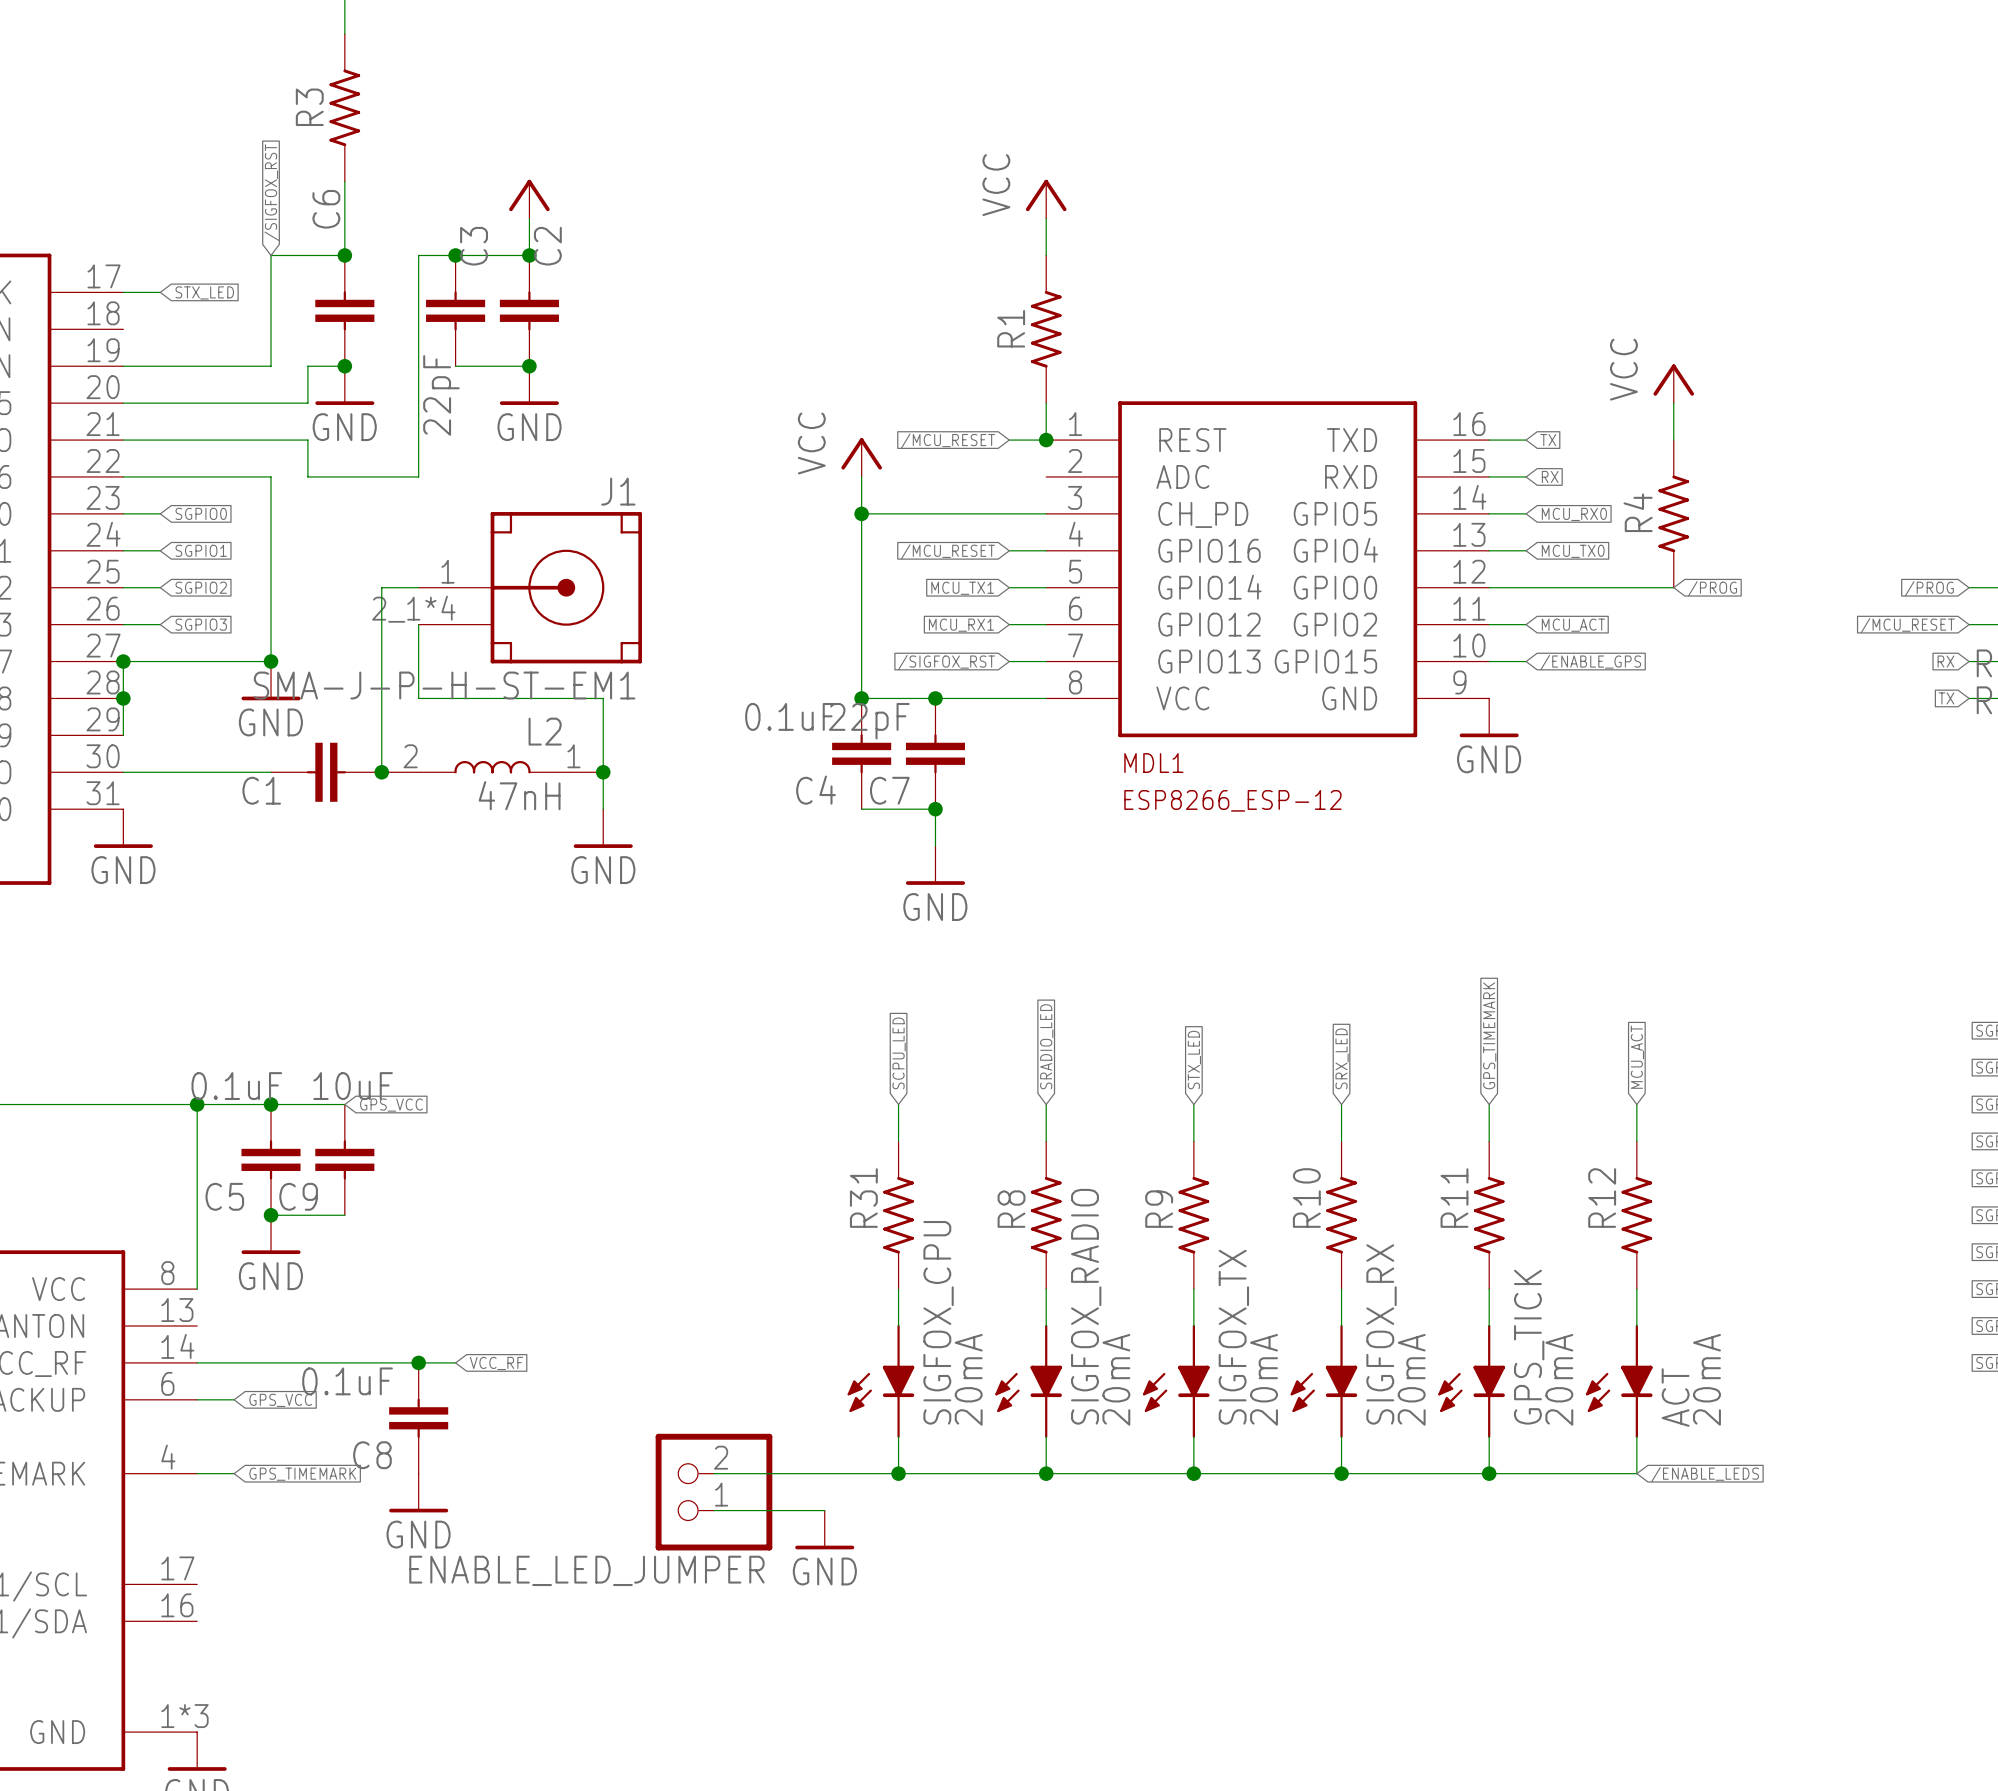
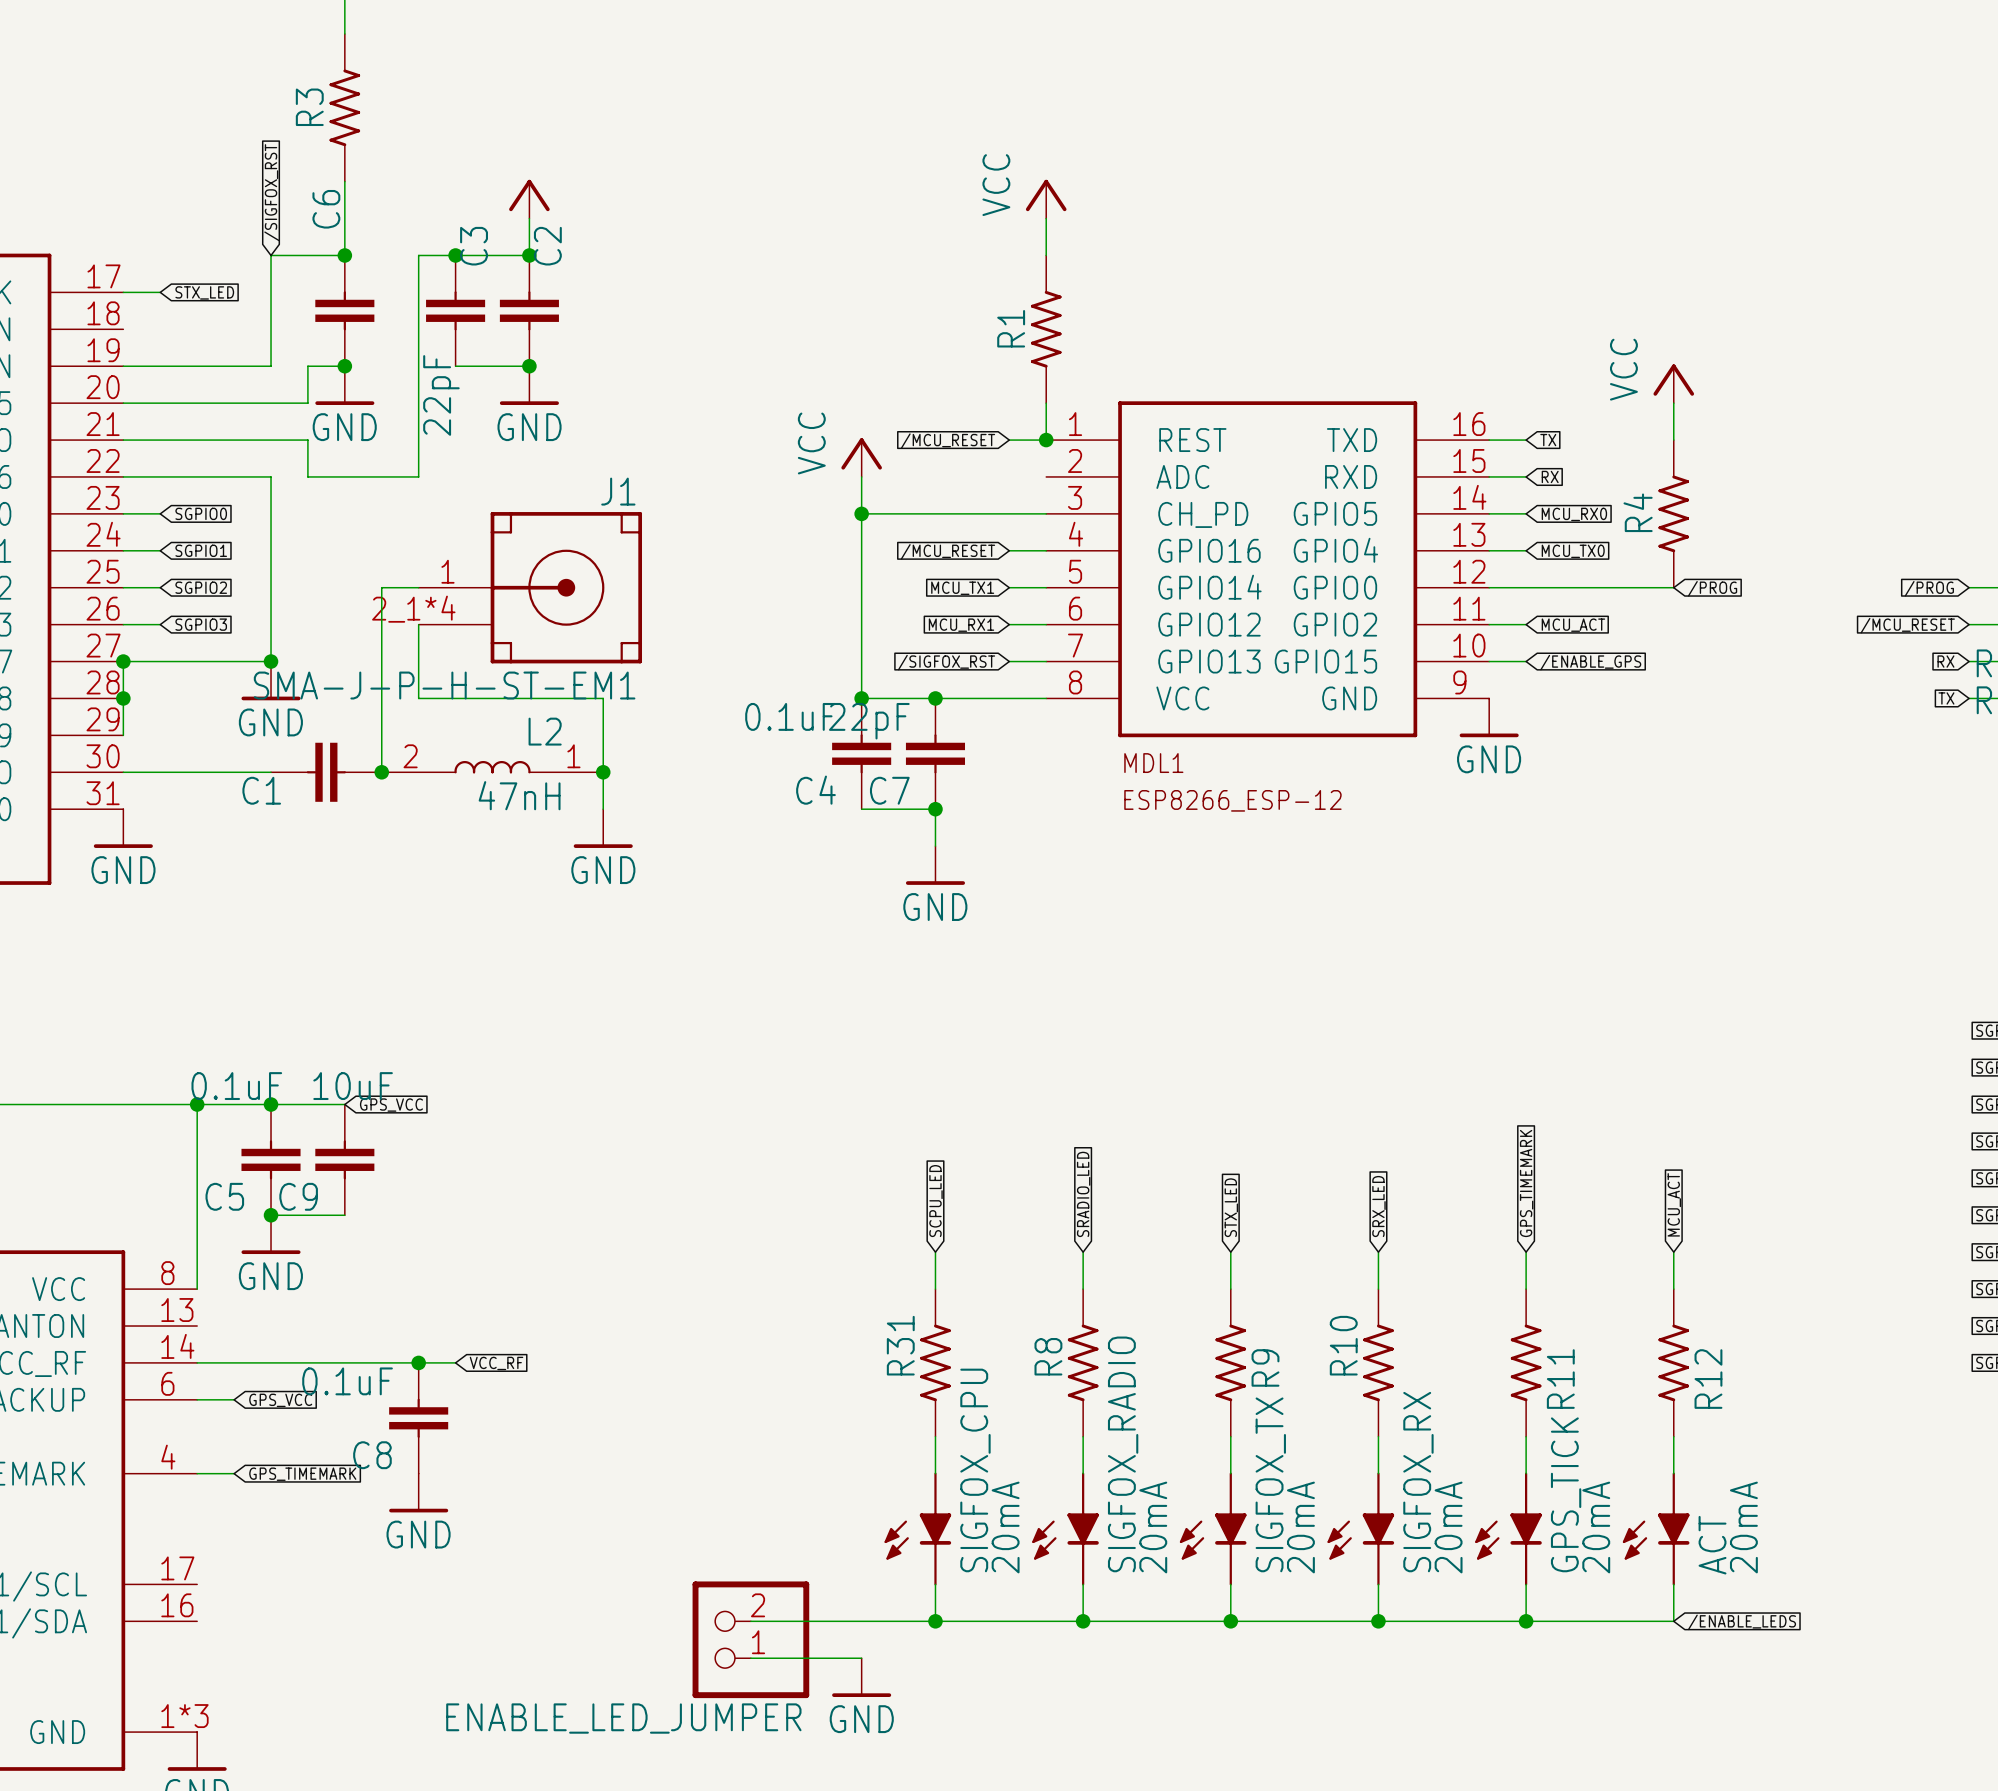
global label position: GPS_TIMEMARK (1489, 1035) -> GPS_TIMEMARK (1526, 1183)
global label position: SRADIO_LED (1046, 1046) -> SRADIO_LED (1083, 1194)
global label position: SCPU_LED (899, 1053) -> SCPU_LED (936, 1201)
global label position: MCU_ACT (1637, 1057) -> MCU_ACT (1674, 1204)
global label position: SRX_LED (1342, 1058) -> SRX_LED (1378, 1206)
global label position: STX_LED (1194, 1060) -> STX_LED (1231, 1207)
wire: (898, 1104) (898, 1141) -> (935, 1252) (935, 1289)
wire: (1046, 1104) (1046, 1141) -> (1083, 1252) (1083, 1289)
wire: (1193, 1104) (1193, 1141) -> (1230, 1252) (1230, 1289)
wire: (1341, 1104) (1341, 1141) -> (1378, 1252) (1378, 1289)
wire: (1489, 1104) (1489, 1141) -> (1526, 1252) (1526, 1289)
wire: (1636, 1104) (1636, 1141) -> (1673, 1252) (1673, 1289)
R11 name position: R11 (1454, 1198) -> R11 (1560, 1379)
R12 name position: R12 (1602, 1198) -> R12 (1708, 1379)
R9 name position: R9 (1159, 1209) -> R9 (1265, 1367)
R31 position: (898, 1215) -> (935, 1362)
R8 position: (1046, 1215) -> (1083, 1362)
R9 position: (1193, 1215) -> (1230, 1362)
R10 position: (1341, 1215) -> (1378, 1362)
R11 position: (1489, 1215) -> (1526, 1362)
R12 position: (1636, 1215) -> (1673, 1362)
wire: (898, 1289) (898, 1326) -> (935, 1436) (935, 1473)
wire: (1046, 1289) (1046, 1326) -> (1083, 1436) (1083, 1473)
wire: (1193, 1289) (1193, 1326) -> (1230, 1436) (1230, 1473)
wire: (1341, 1289) (1341, 1326) -> (1378, 1436) (1378, 1473)
wire: (1489, 1289) (1489, 1326) -> (1526, 1436) (1526, 1473)
wire: (1636, 1289) (1636, 1326) -> (1673, 1436) (1673, 1473)
SIGFOX_CPU position: (880, 1381) -> (917, 1529)
SIGFOX_RADIO position: (1028, 1381) -> (1065, 1529)
SIGFOX_TX position: (1176, 1381) -> (1213, 1529)
SIGFOX_RX position: (1323, 1381) -> (1360, 1529)
GPS_TICK position: (1471, 1381) -> (1508, 1529)
ACT position: (1619, 1381) -> (1656, 1529)
wire: (898, 1436) (898, 1473) -> (935, 1584) (935, 1621)
wire: (1046, 1436) (1046, 1473) -> (1083, 1584) (1083, 1621)
wire: (1193, 1436) (1193, 1473) -> (1230, 1584) (1230, 1621)
wire: (1341, 1436) (1341, 1473) -> (1378, 1584) (1378, 1621)
wire: (1489, 1436) (1489, 1473) -> (1526, 1584) (1526, 1621)
wire: (1636, 1436) (1636, 1473) (713, 1473) -> (1673, 1584) (1673, 1621) (750, 1621)
junction: (898, 1473) -> none
junction: (1046, 1473) -> none
junction: (1193, 1473) -> none
junction: (1341, 1473) -> none
junction: (1489, 1473) -> none
global label position: /ENABLE_LEDS (1705, 1474) -> /ENABLE_LEDS (1741, 1622)
ENABLE_LED_JUMPER position: (713, 1492) -> (750, 1639)
wire: (713, 1510) (824, 1510) -> (750, 1658) (861, 1658)
power symbol position: GND (824, 1529) -> GND (861, 1677)
junction: none -> (935, 1621)
junction: none -> (1083, 1621)
junction: none -> (1230, 1621)
junction: none -> (1378, 1621)
junction: none -> (1526, 1621)

